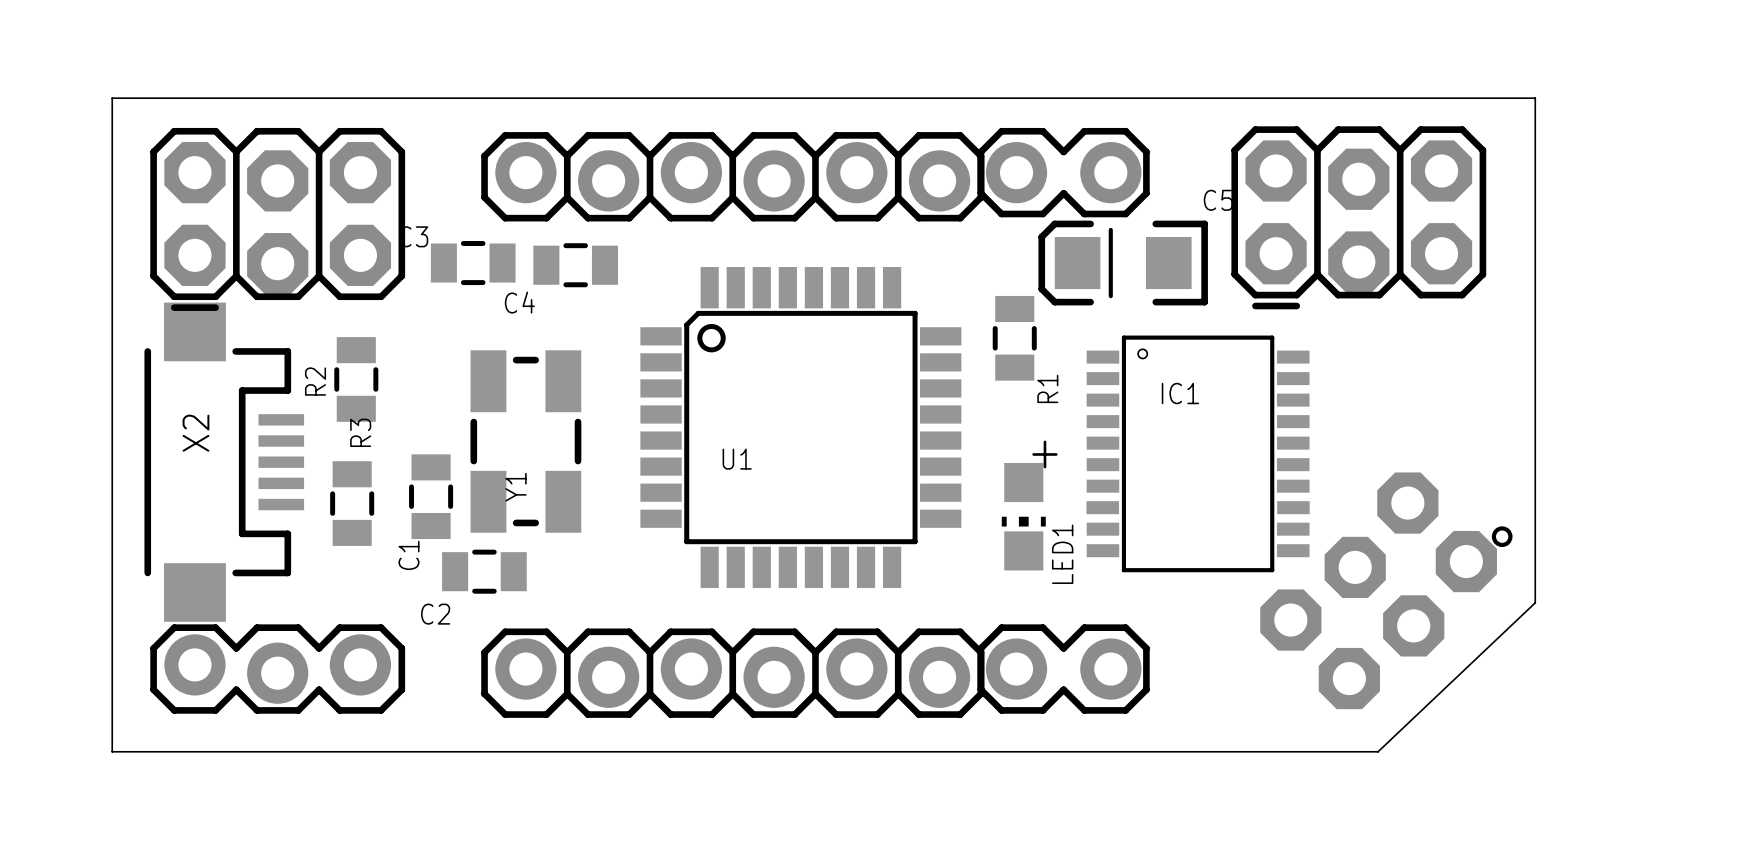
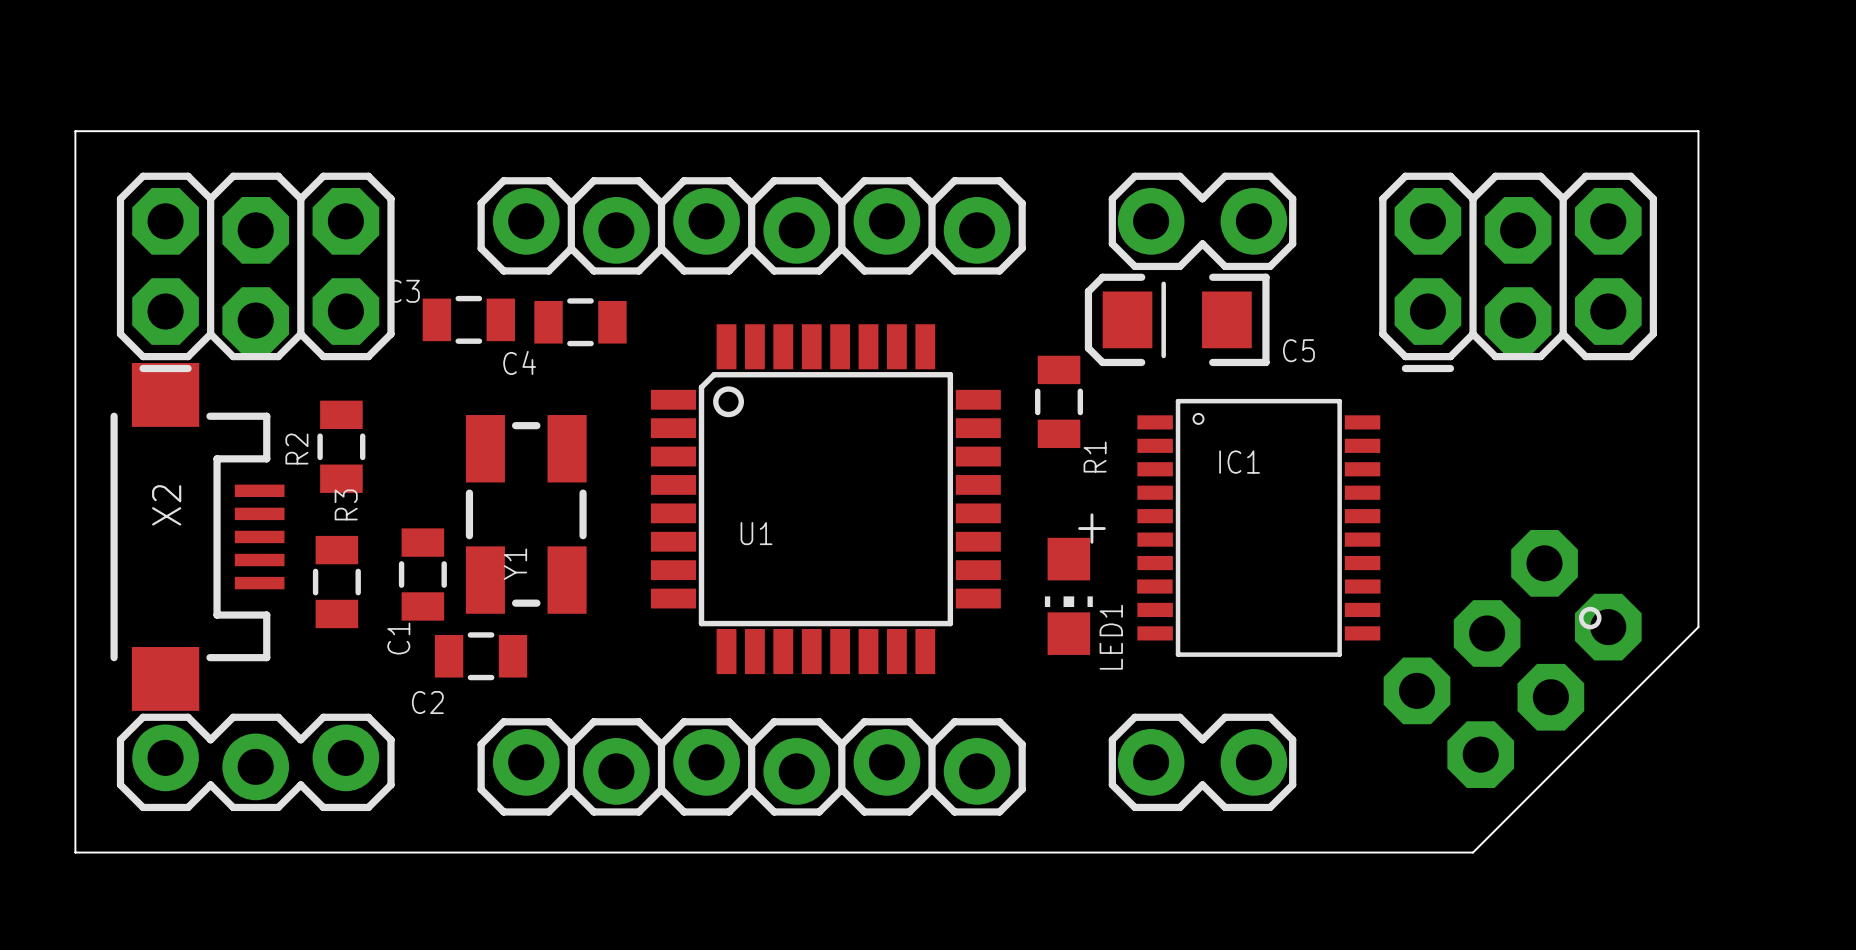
board edge: (112, 98) (1535, 98) (1535, 602) (1378, 751) -> (75, 140) (75, 131) (1698, 131) (1698, 627) (1473, 852) (1454, 852)
part position: (1063, 172) -> (1202, 221)
C5 name position: C5 (1218, 200) -> C5 (1298, 350)
part position: (1358, 217) -> (1518, 272)
part position: (1378, 590) -> (1512, 658)
part position: (1063, 669) -> (1202, 762)

